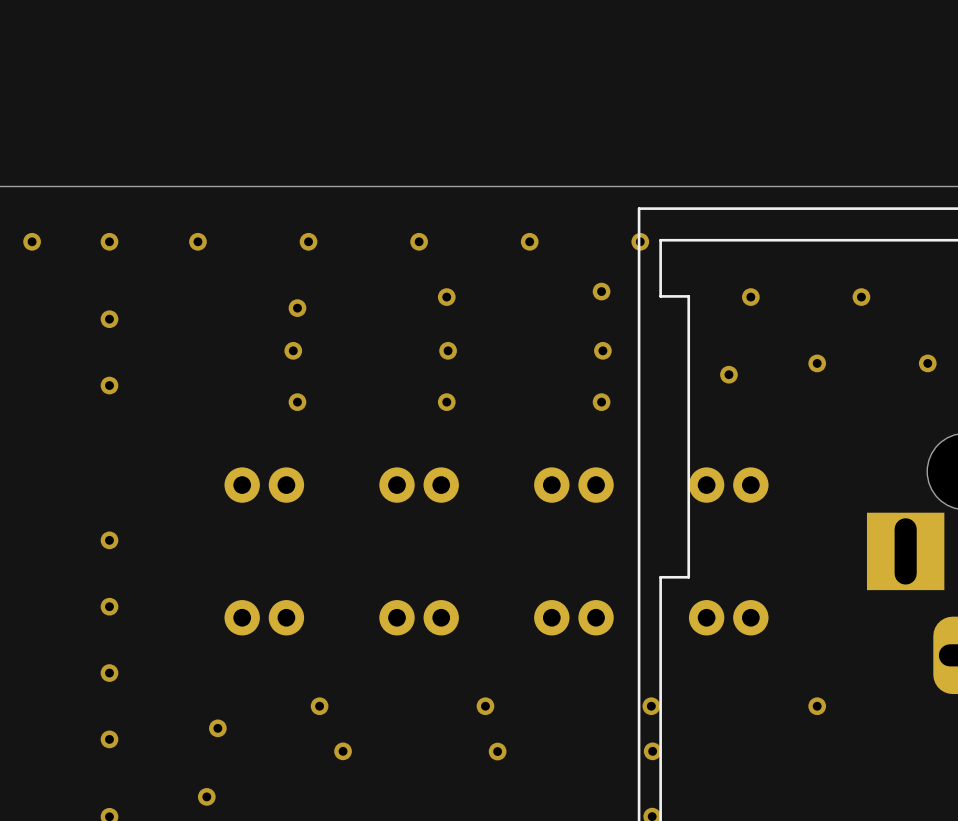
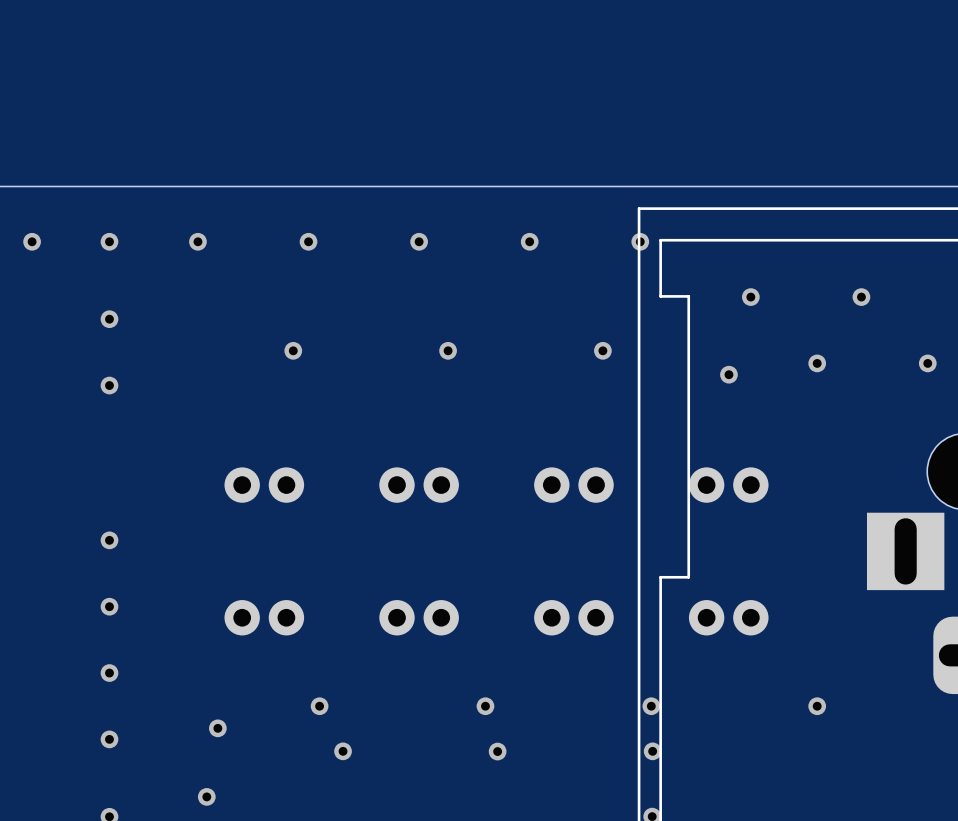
via: (601, 291) -> none
via: (446, 297) -> none
via: (297, 308) -> none
via: (297, 402) -> none
via: (446, 402) -> none
via: (601, 402) -> none

